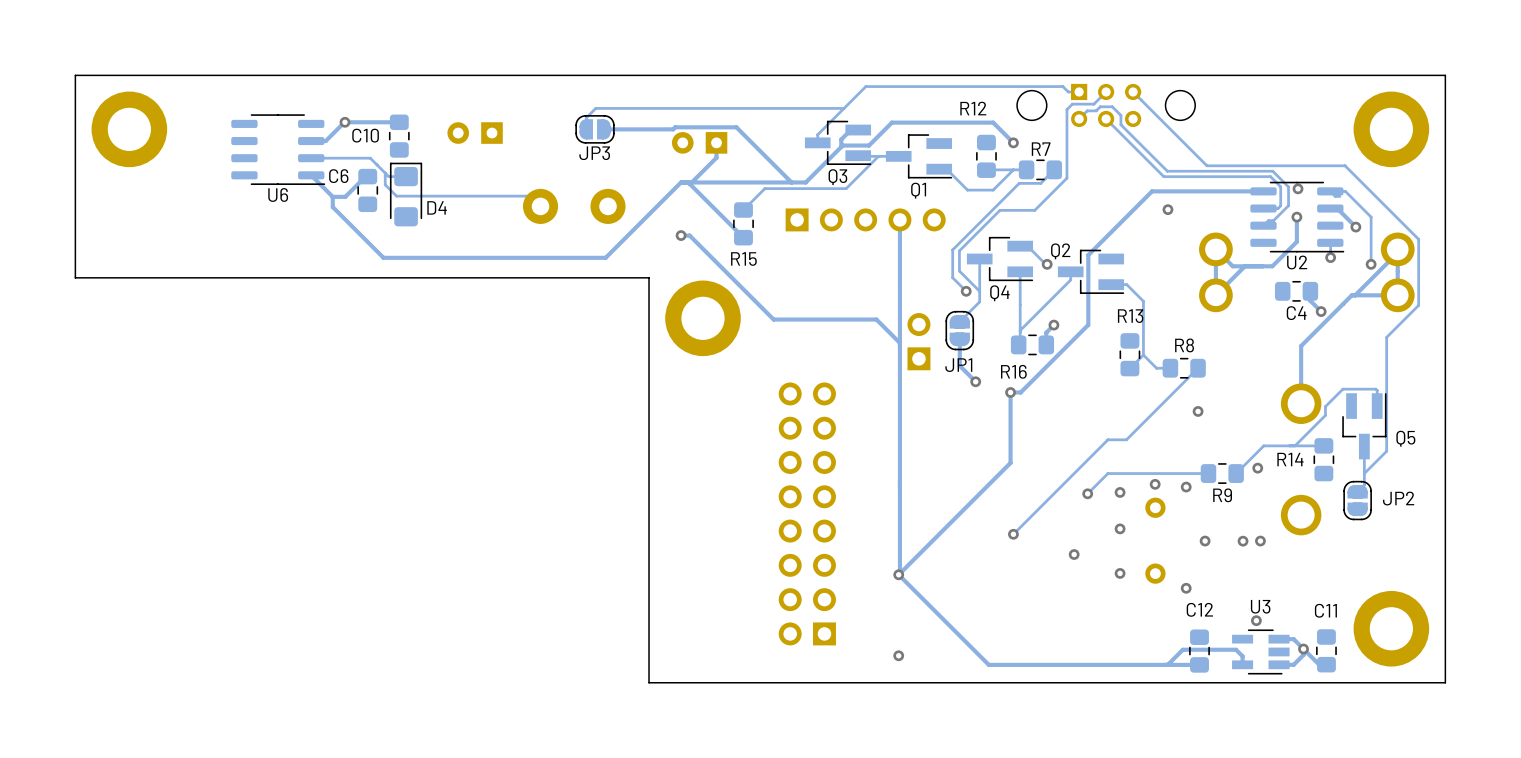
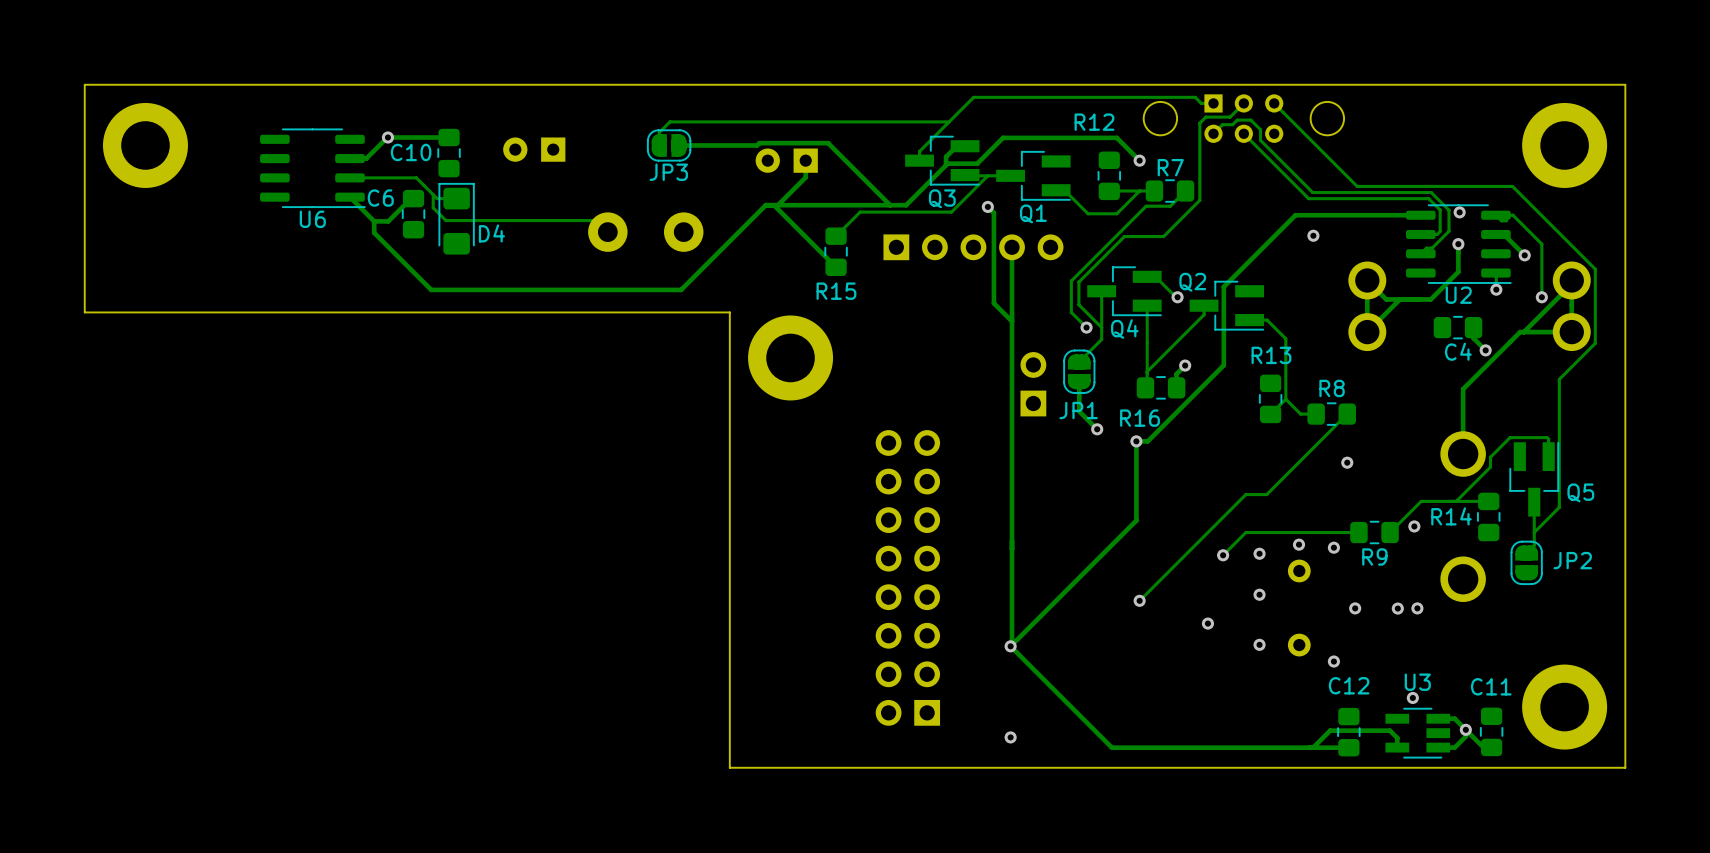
track: none -> (987, 206) (993, 213) (993, 303) (1012, 321)
via: none -> (987, 206)
track: (681, 235) (689, 235) (773, 319) (876, 319) (899, 342) -> none
via: (681, 235) -> none

